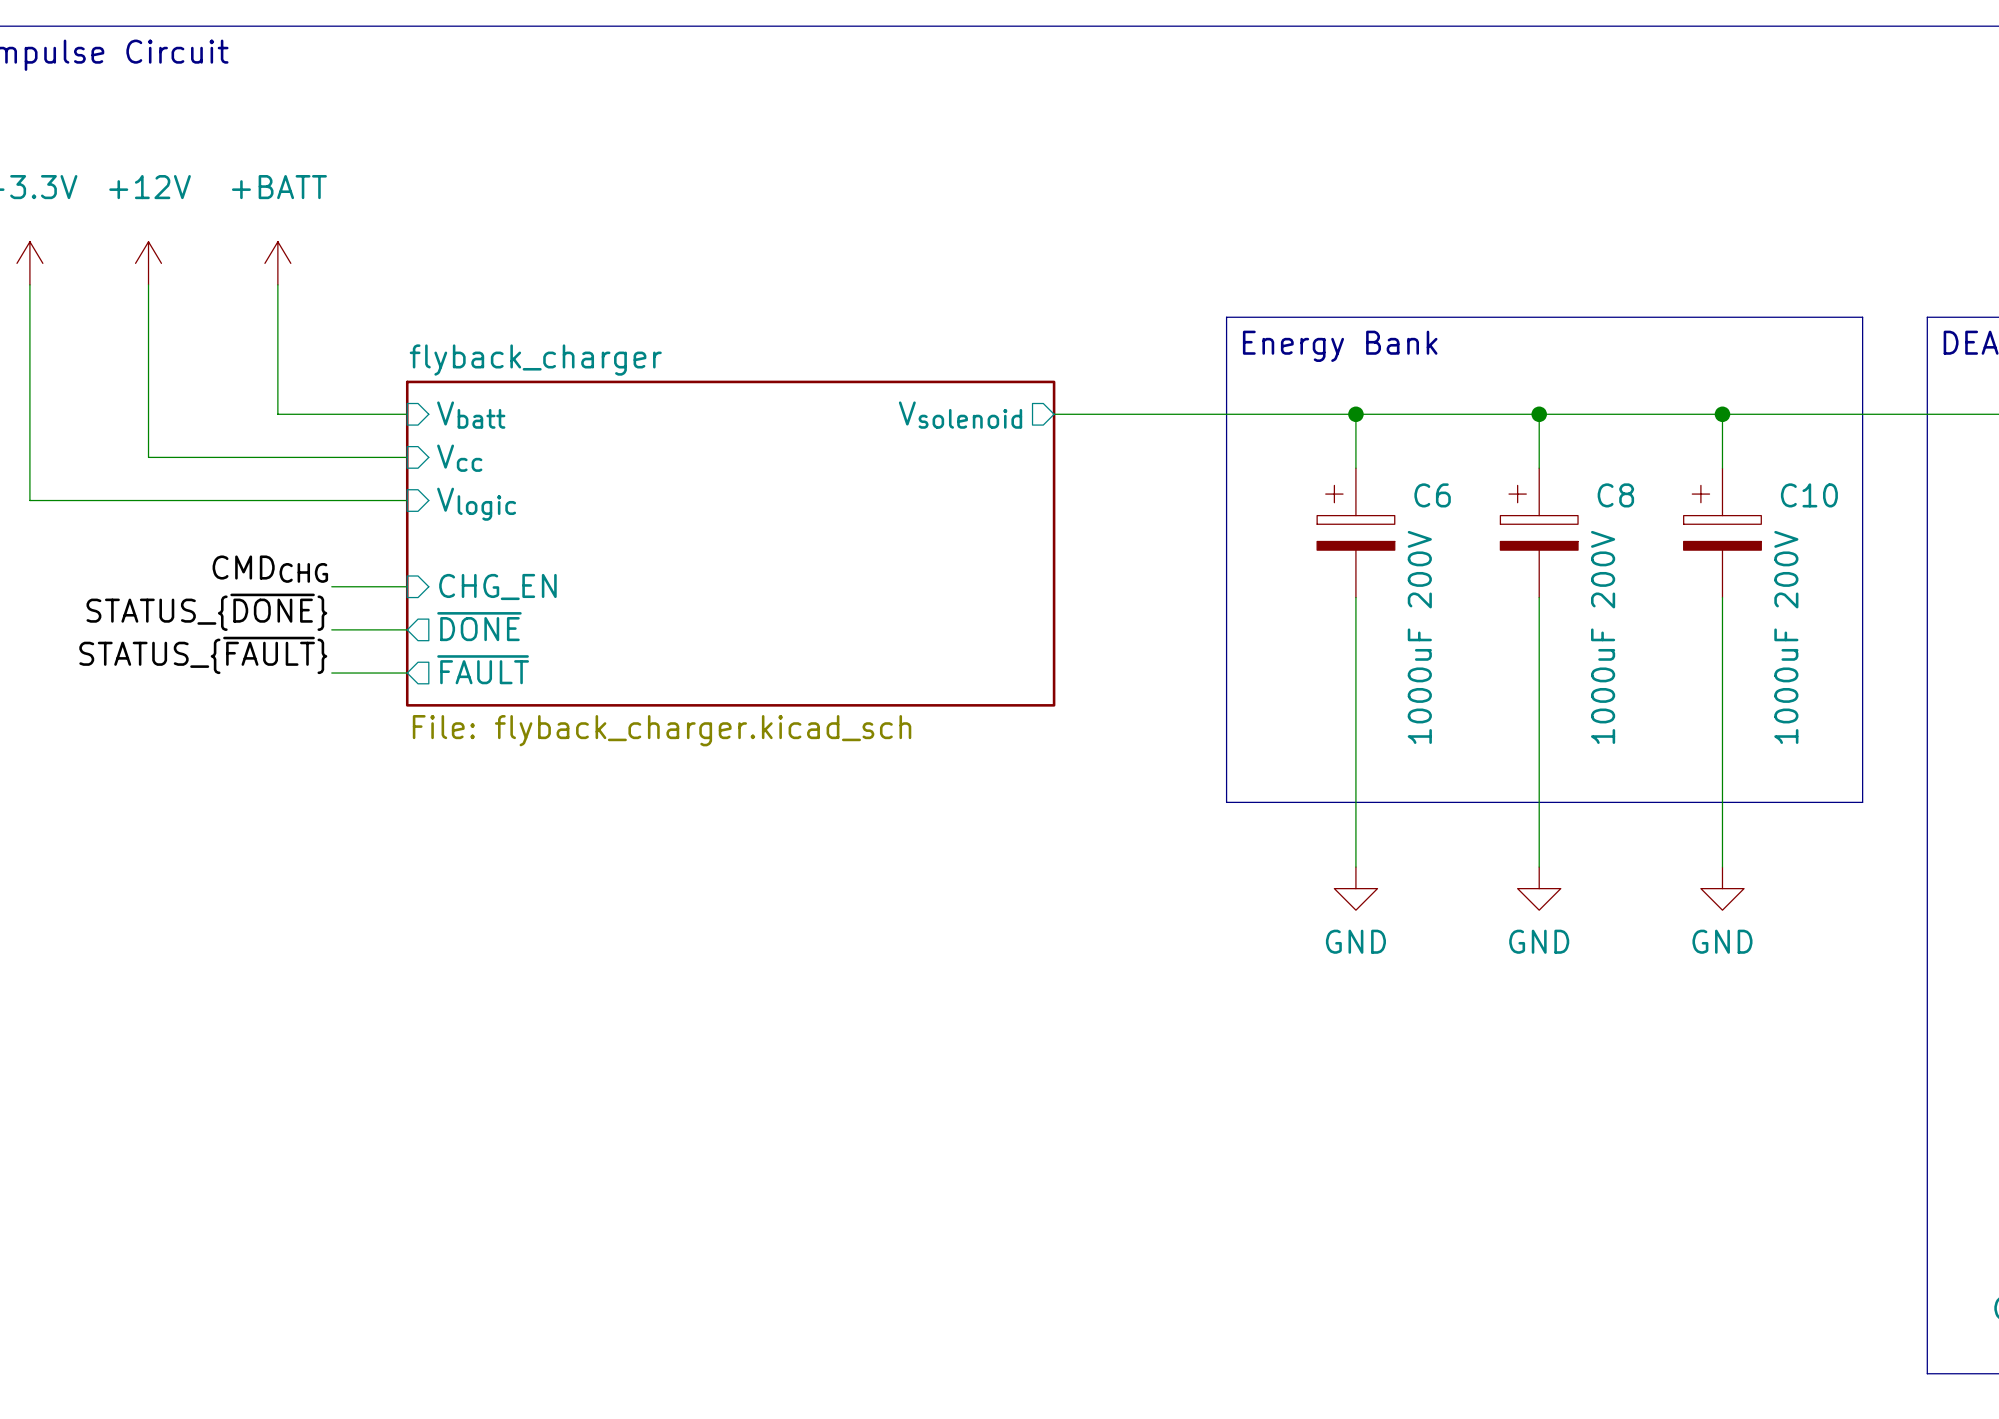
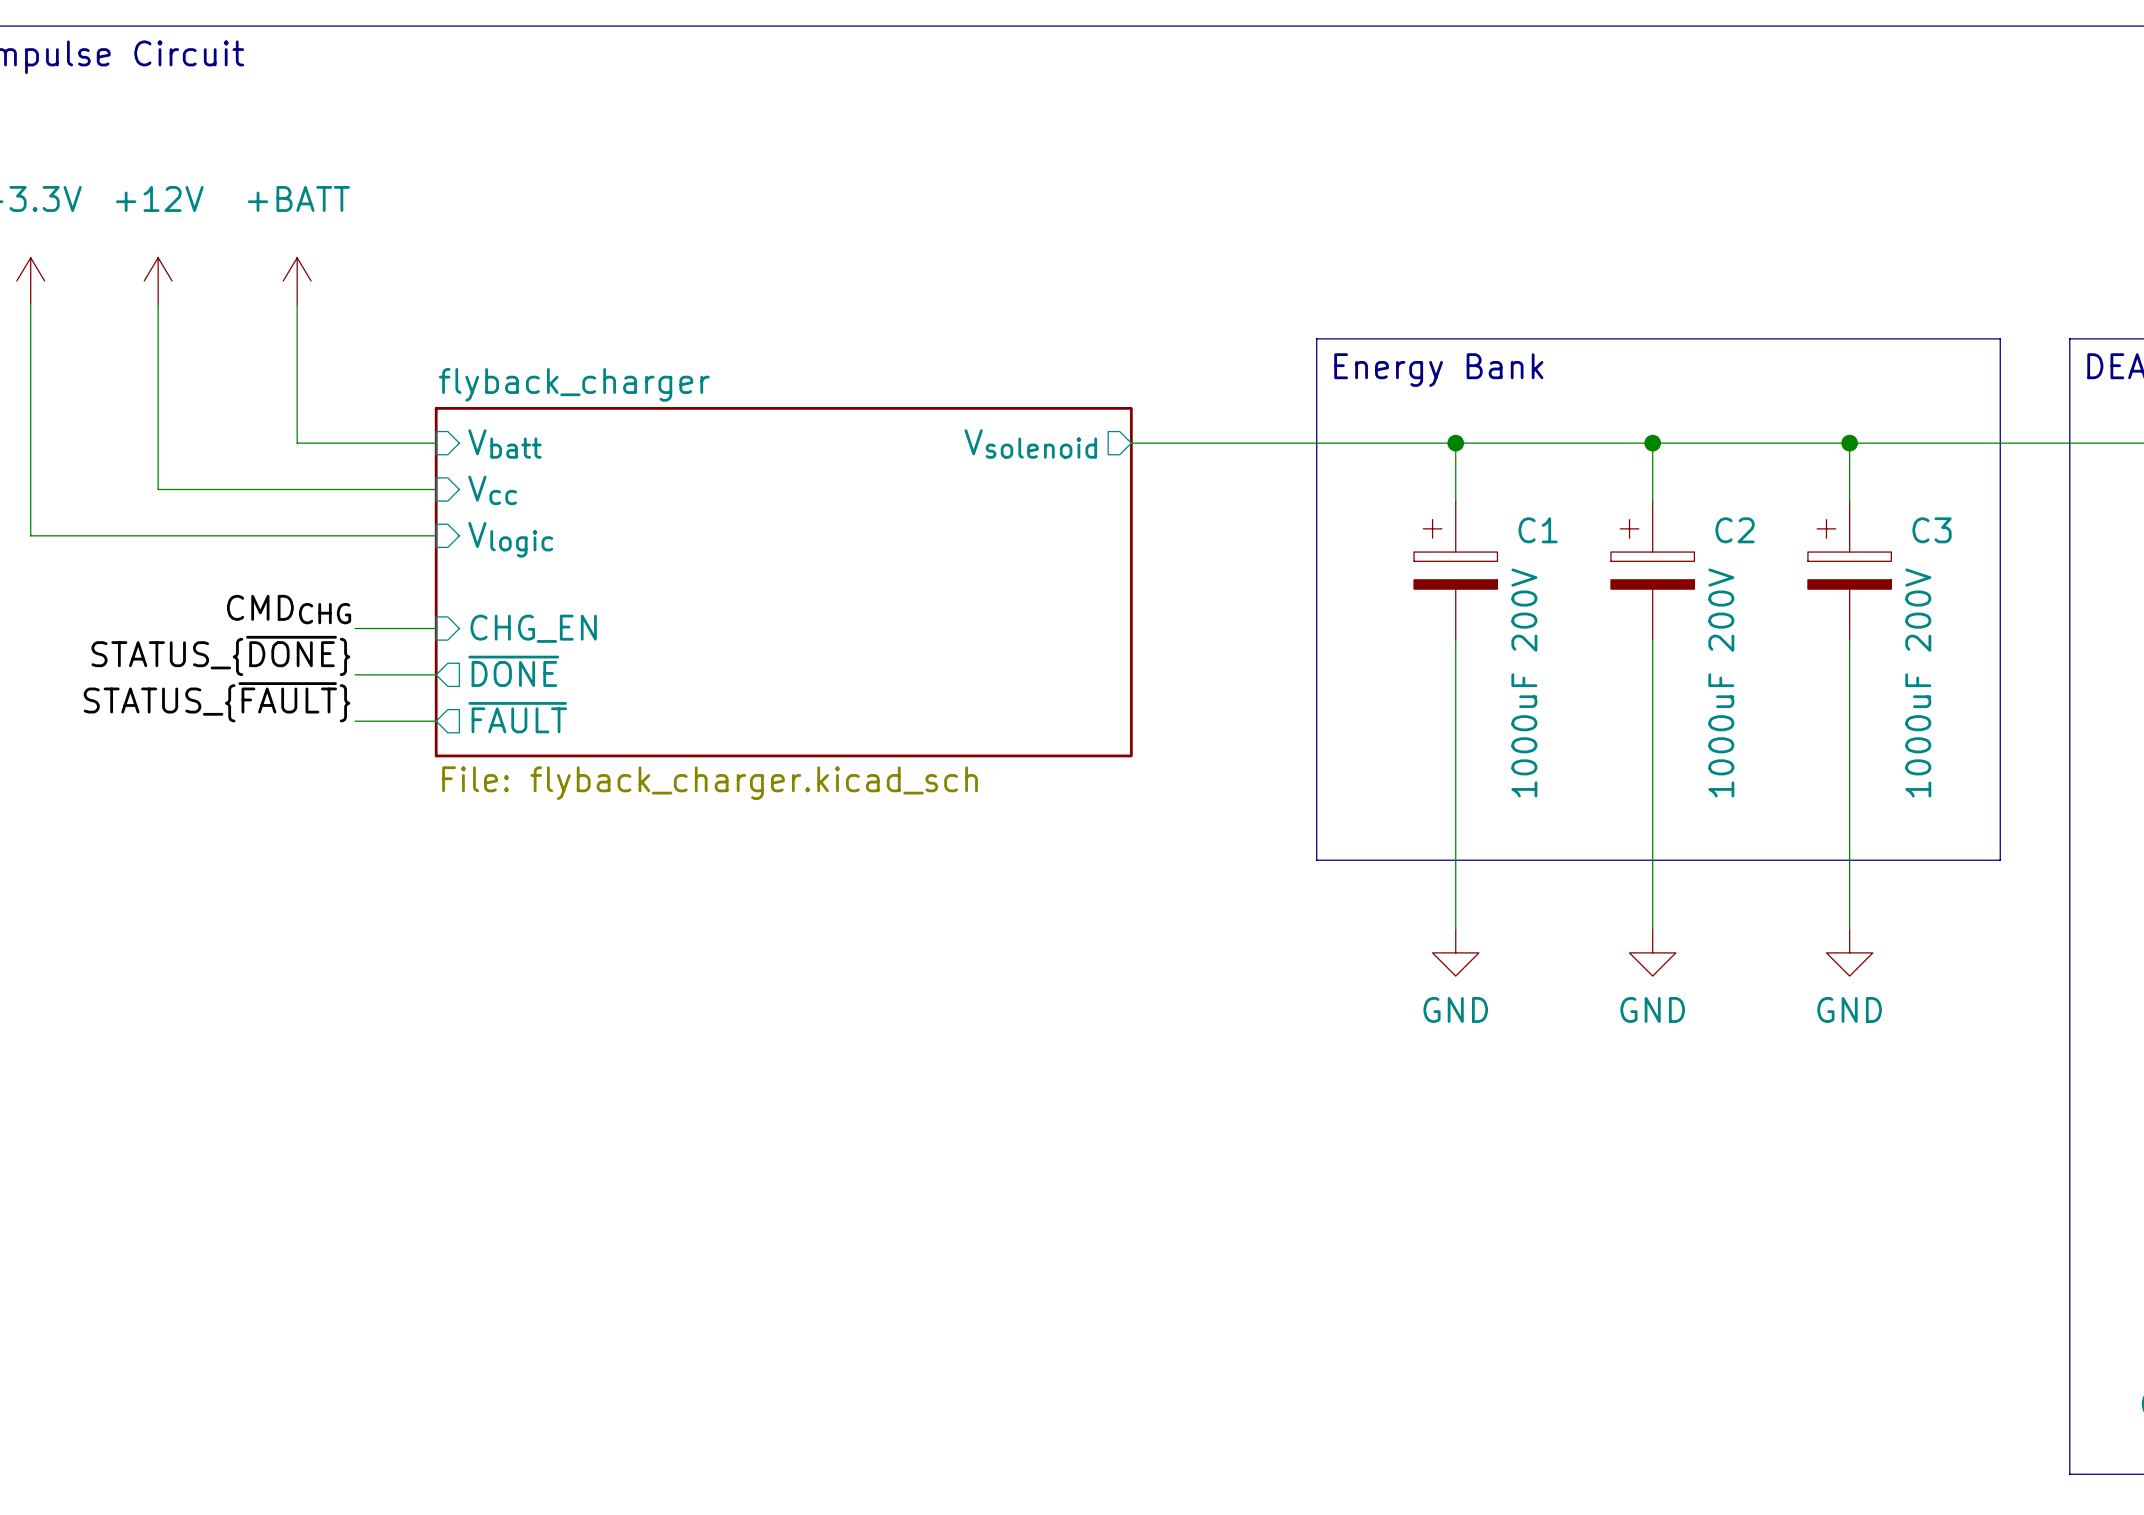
C6 name: C6 (1432, 495) -> C1 (1538, 530)
C8 name: C8 (1615, 495) -> C2 (1735, 530)
C10 name: C10 (1809, 495) -> C3 (1932, 530)

